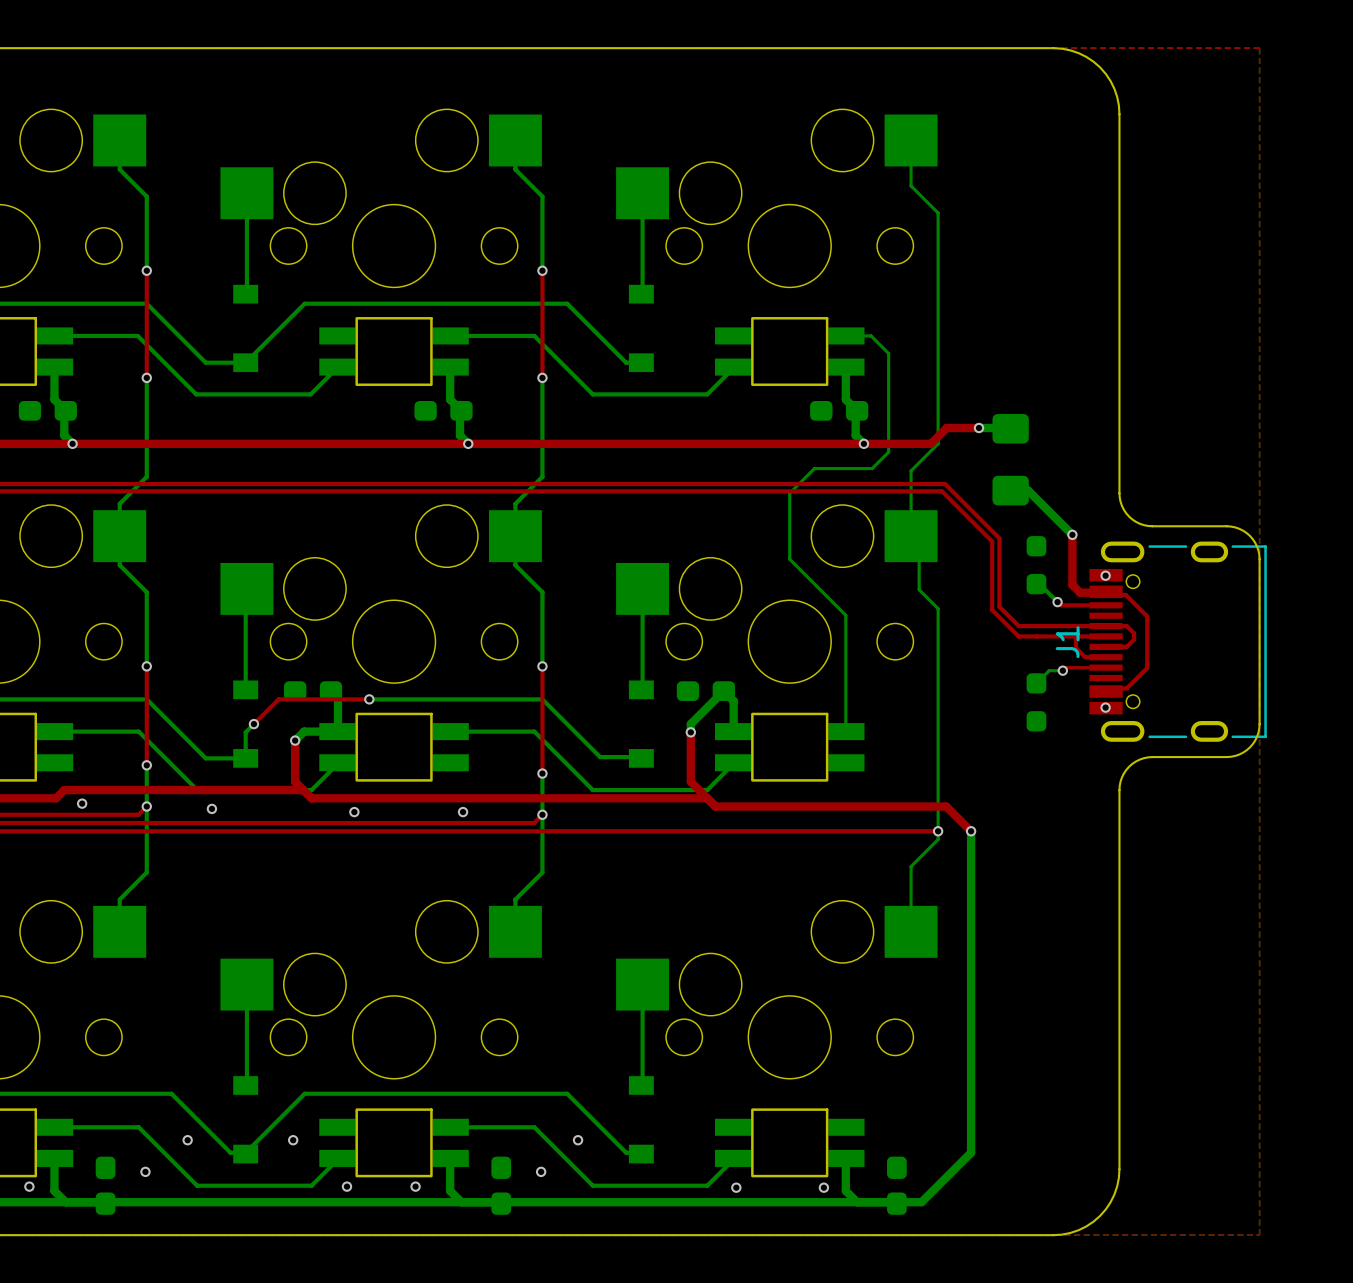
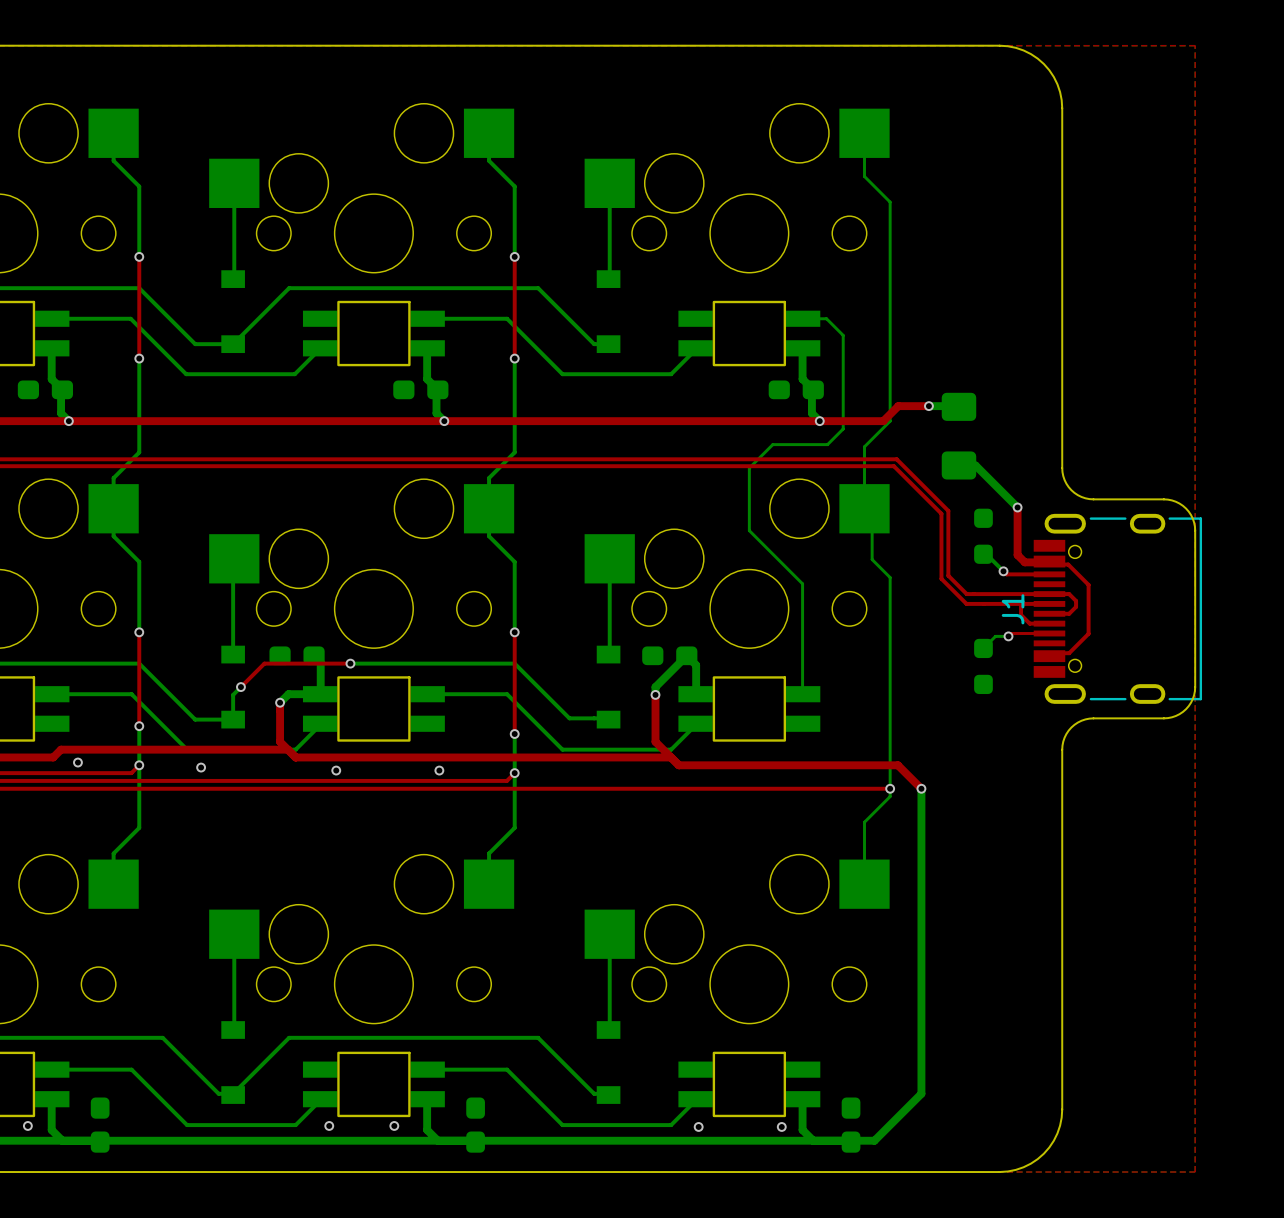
via: (1105, 575) -> none
via: (1105, 707) -> none
via: (187, 1140) -> none
via: (293, 1140) -> none
via: (578, 1140) -> none
via: (145, 1171) -> none
via: (541, 1171) -> none

